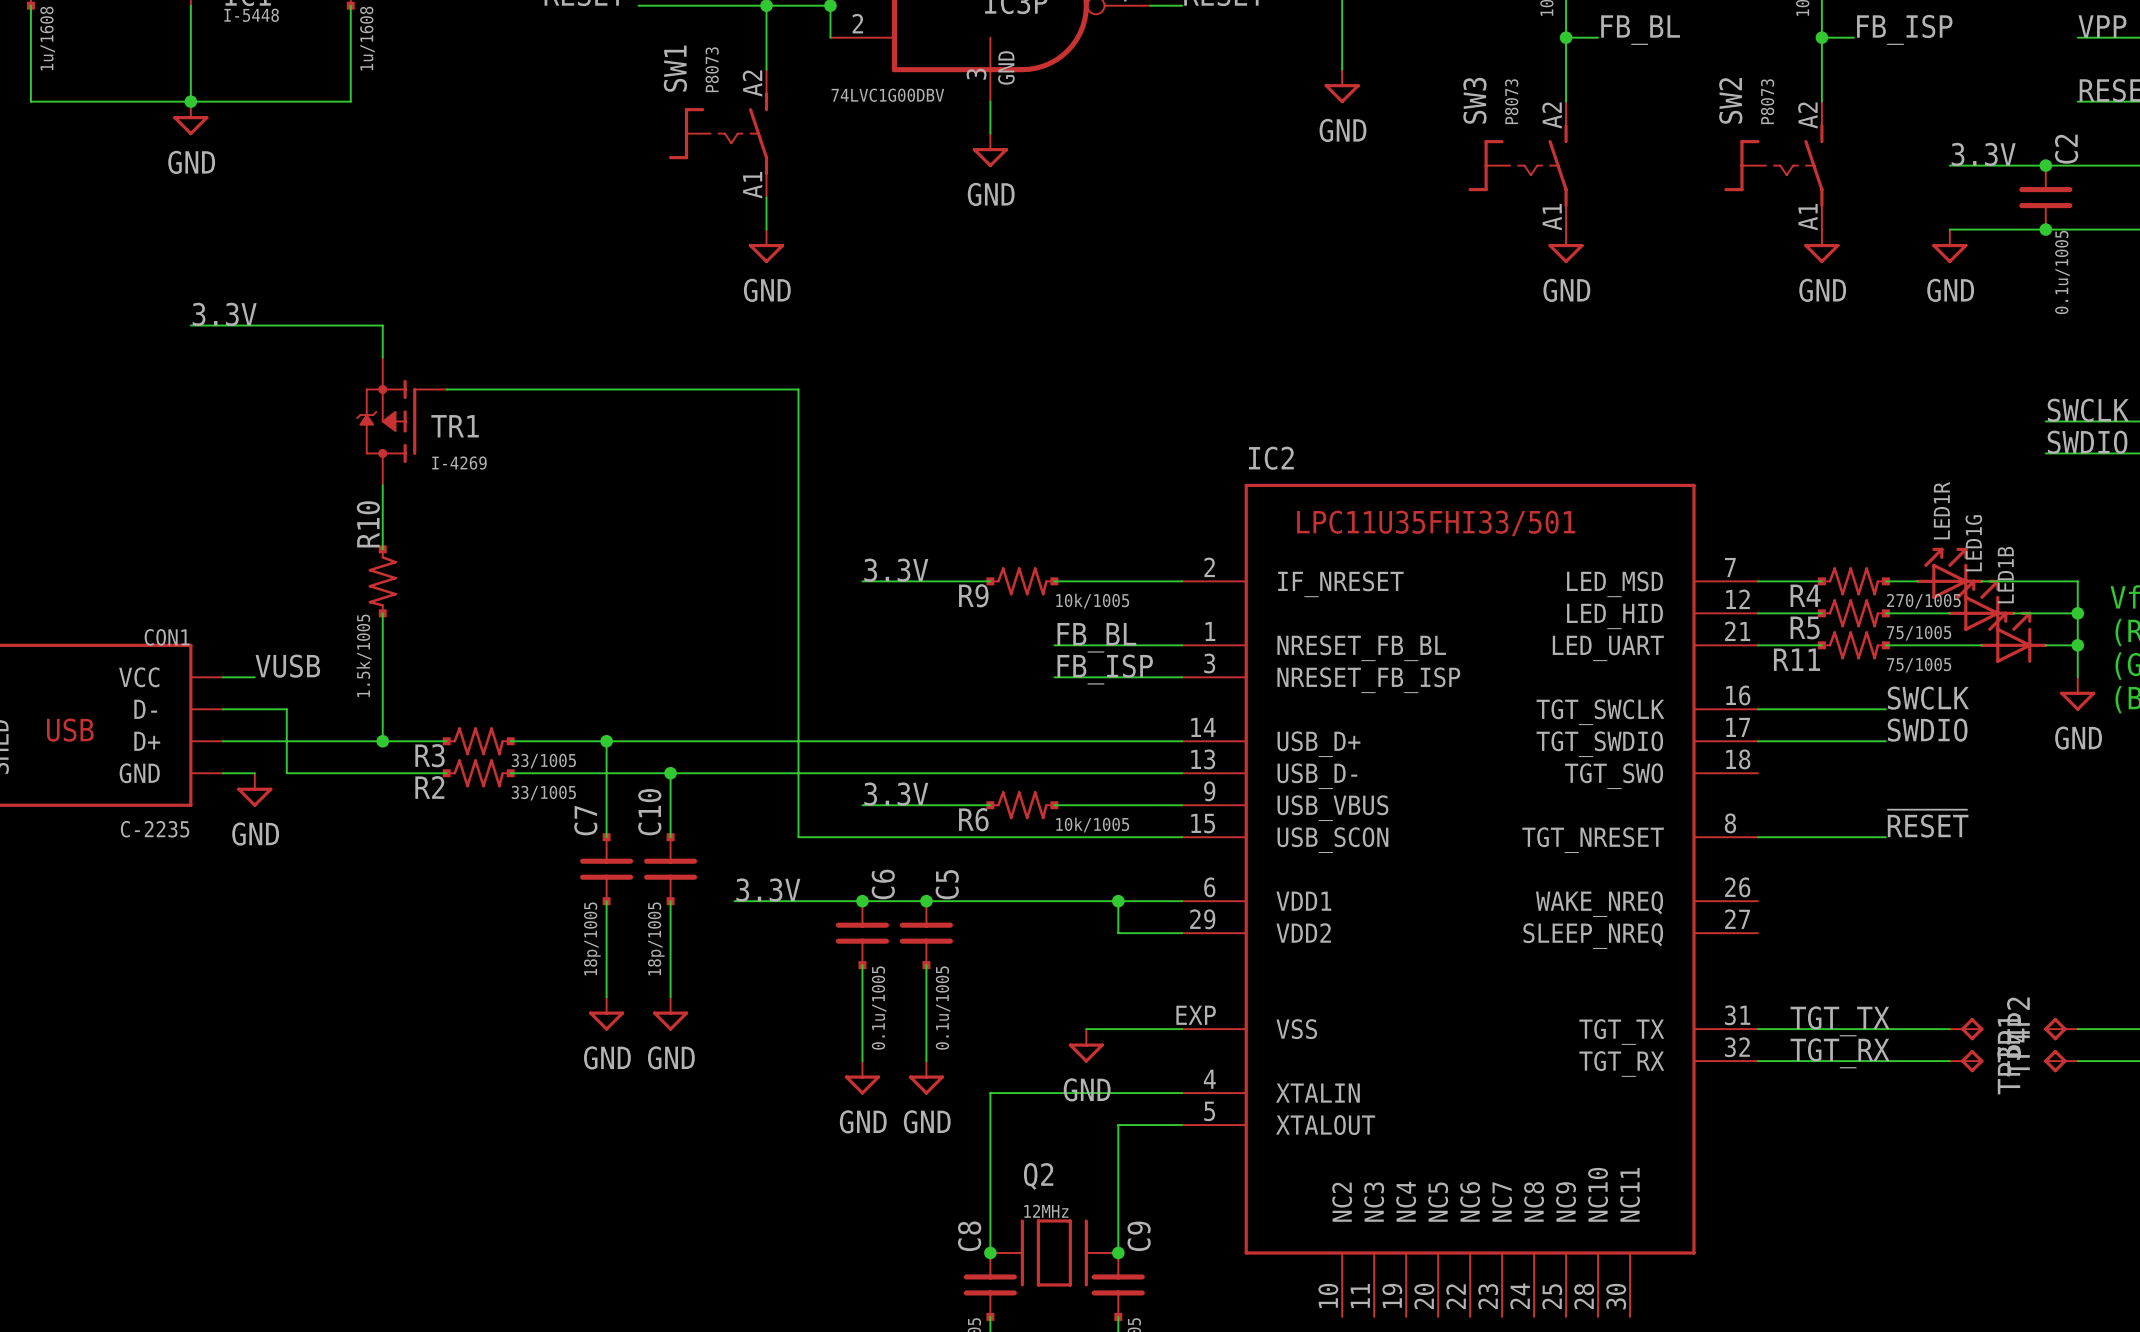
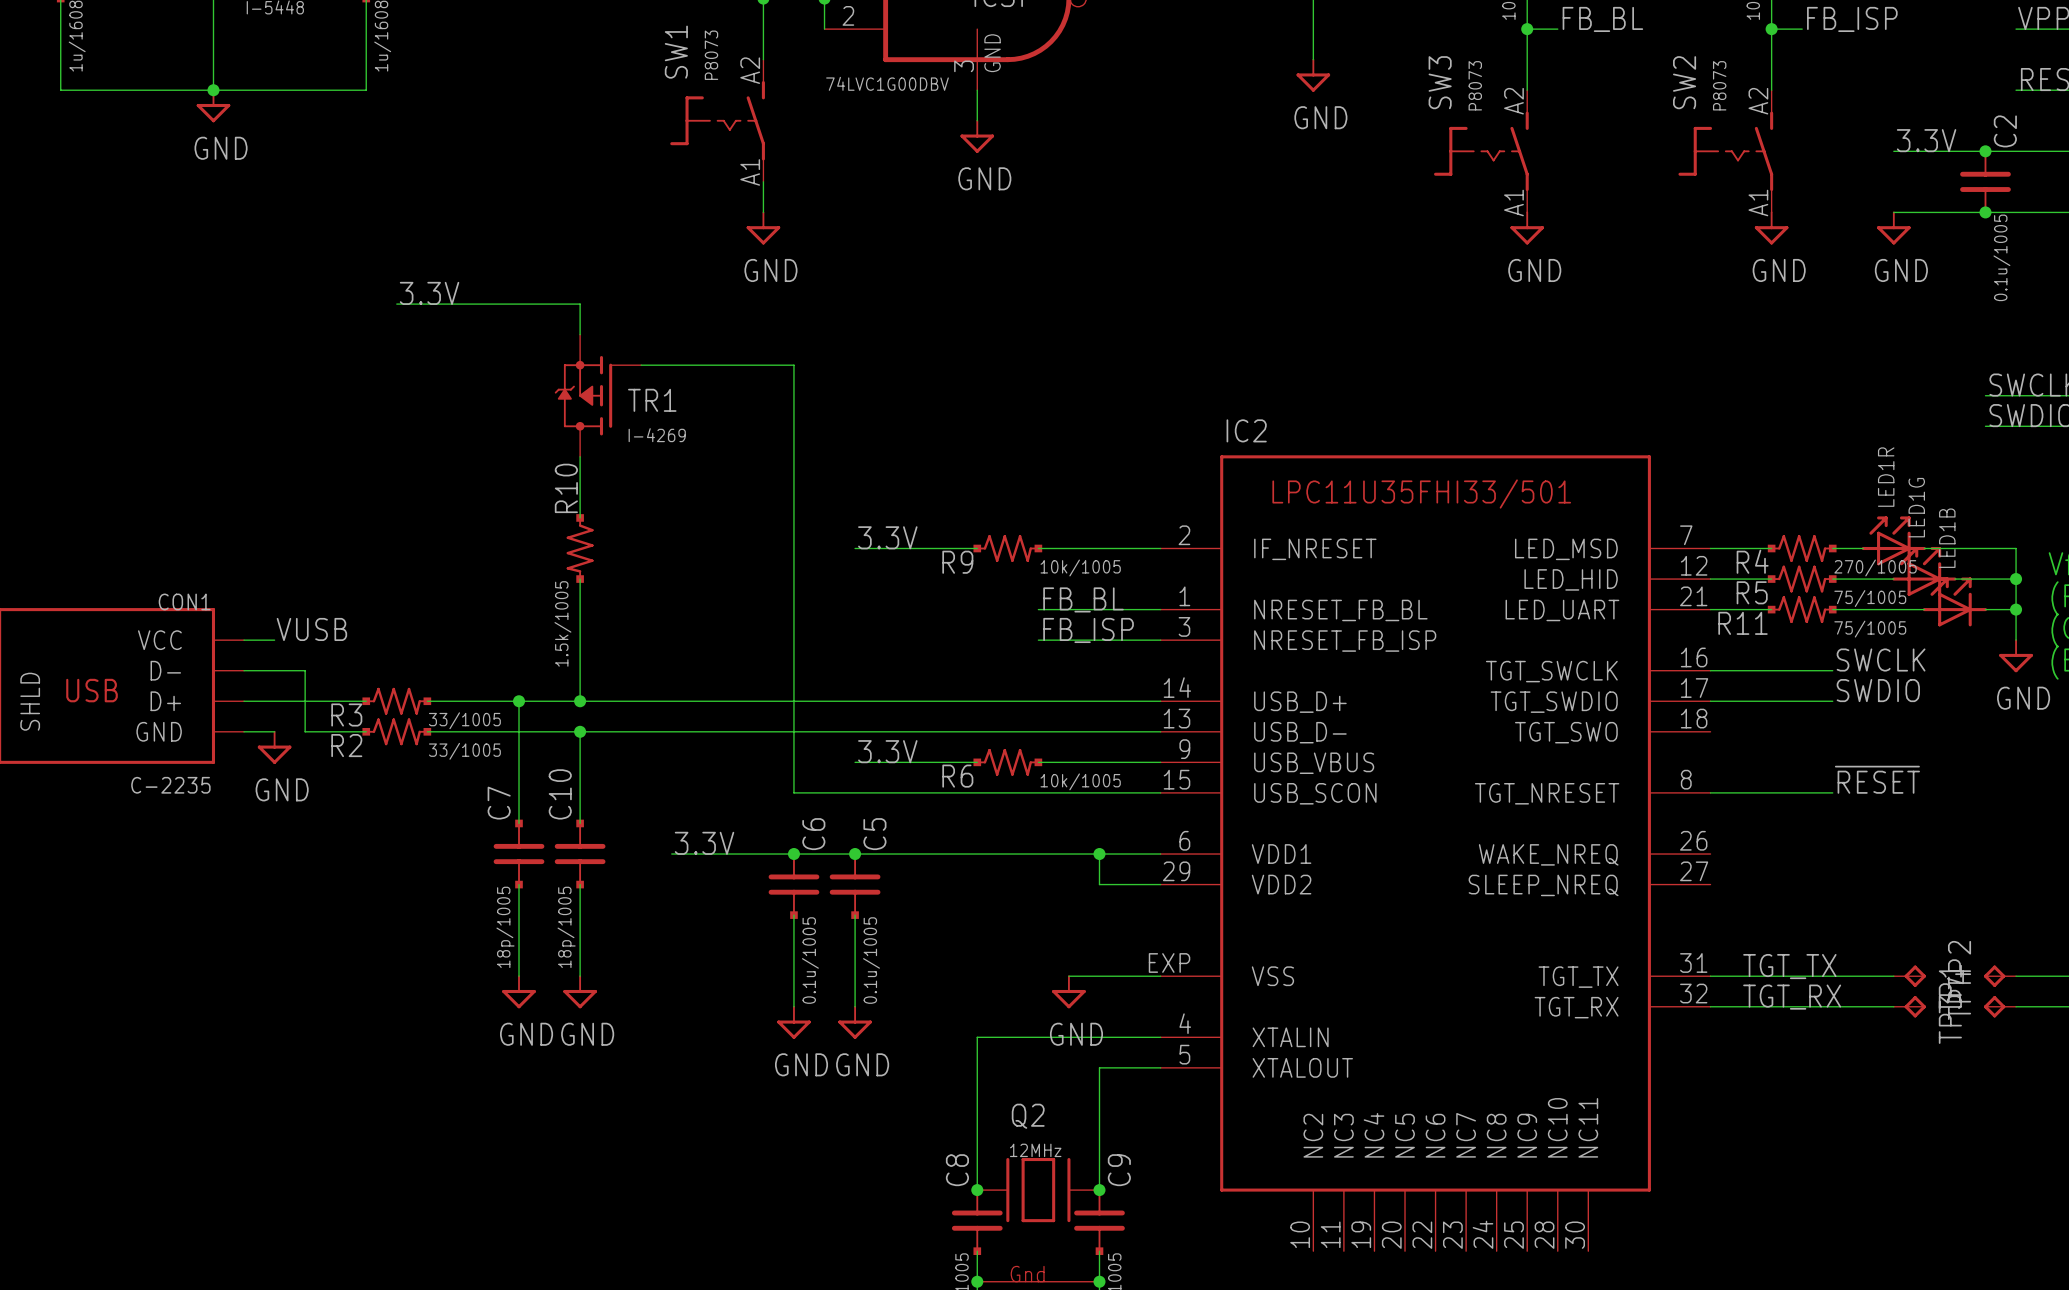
label position: 3.3V (224, 314) -> 3.3V (429, 293)
wire: (190, 325) (382, 325) (382, 357) -> (396, 304) (580, 304) (580, 334)
wire: (446, 389) (638, 389) -> none
TR1 position: (401, 421) -> (597, 395)
wire: (382, 485) (382, 549) -> (580, 456) (580, 517)
R10 position: (382, 581) -> (580, 548)
wire: (382, 613) (382, 741) -> (580, 579) (580, 701)
R3 symbol: [442, 727, 515, 756] -> [362, 687, 432, 715]
junction: (382, 741) -> none
wire: none -> (457, 701) (519, 701) (519, 823)
junction: none -> (519, 701)
junction: none -> (580, 701)
wire: (606, 741) (606, 837) -> (580, 731) (580, 823)
junction: (606, 741) -> none
R2 symbol: [442, 759, 515, 788] -> [362, 718, 432, 746]
junction: none -> (580, 731)
wire: (670, 773) (670, 837) -> none
junction: (670, 773) -> none
C7 position: (606, 869) -> (519, 854)
C10 position: (670, 869) -> (580, 854)
C6 name: C6 (883, 884) -> C5 (874, 834)
label position: 3.3V (768, 890) -> 3.3V (704, 843)
wire: (606, 901) (606, 997) -> (580, 884) (580, 976)
wire: (670, 901) (670, 997) -> (671, 854) (732, 854)
junction: none -> (793, 854)
junction: (926, 901) -> none
wire: none -> (519, 884) (519, 976)
C6: none -> 0.1u/1005 (793, 884)
C5: 0.1u/1005 (926, 933) -> none
wire: (926, 965) (926, 1061) -> (793, 915) (793, 1006)
power symbol position: GND (606, 1013) -> GND (580, 991)
power symbol: GND (670, 1013) -> none
power symbol: none -> GND (519, 991)
power symbol: none -> GND (793, 1022)
power symbol: GND (926, 1077) -> none

